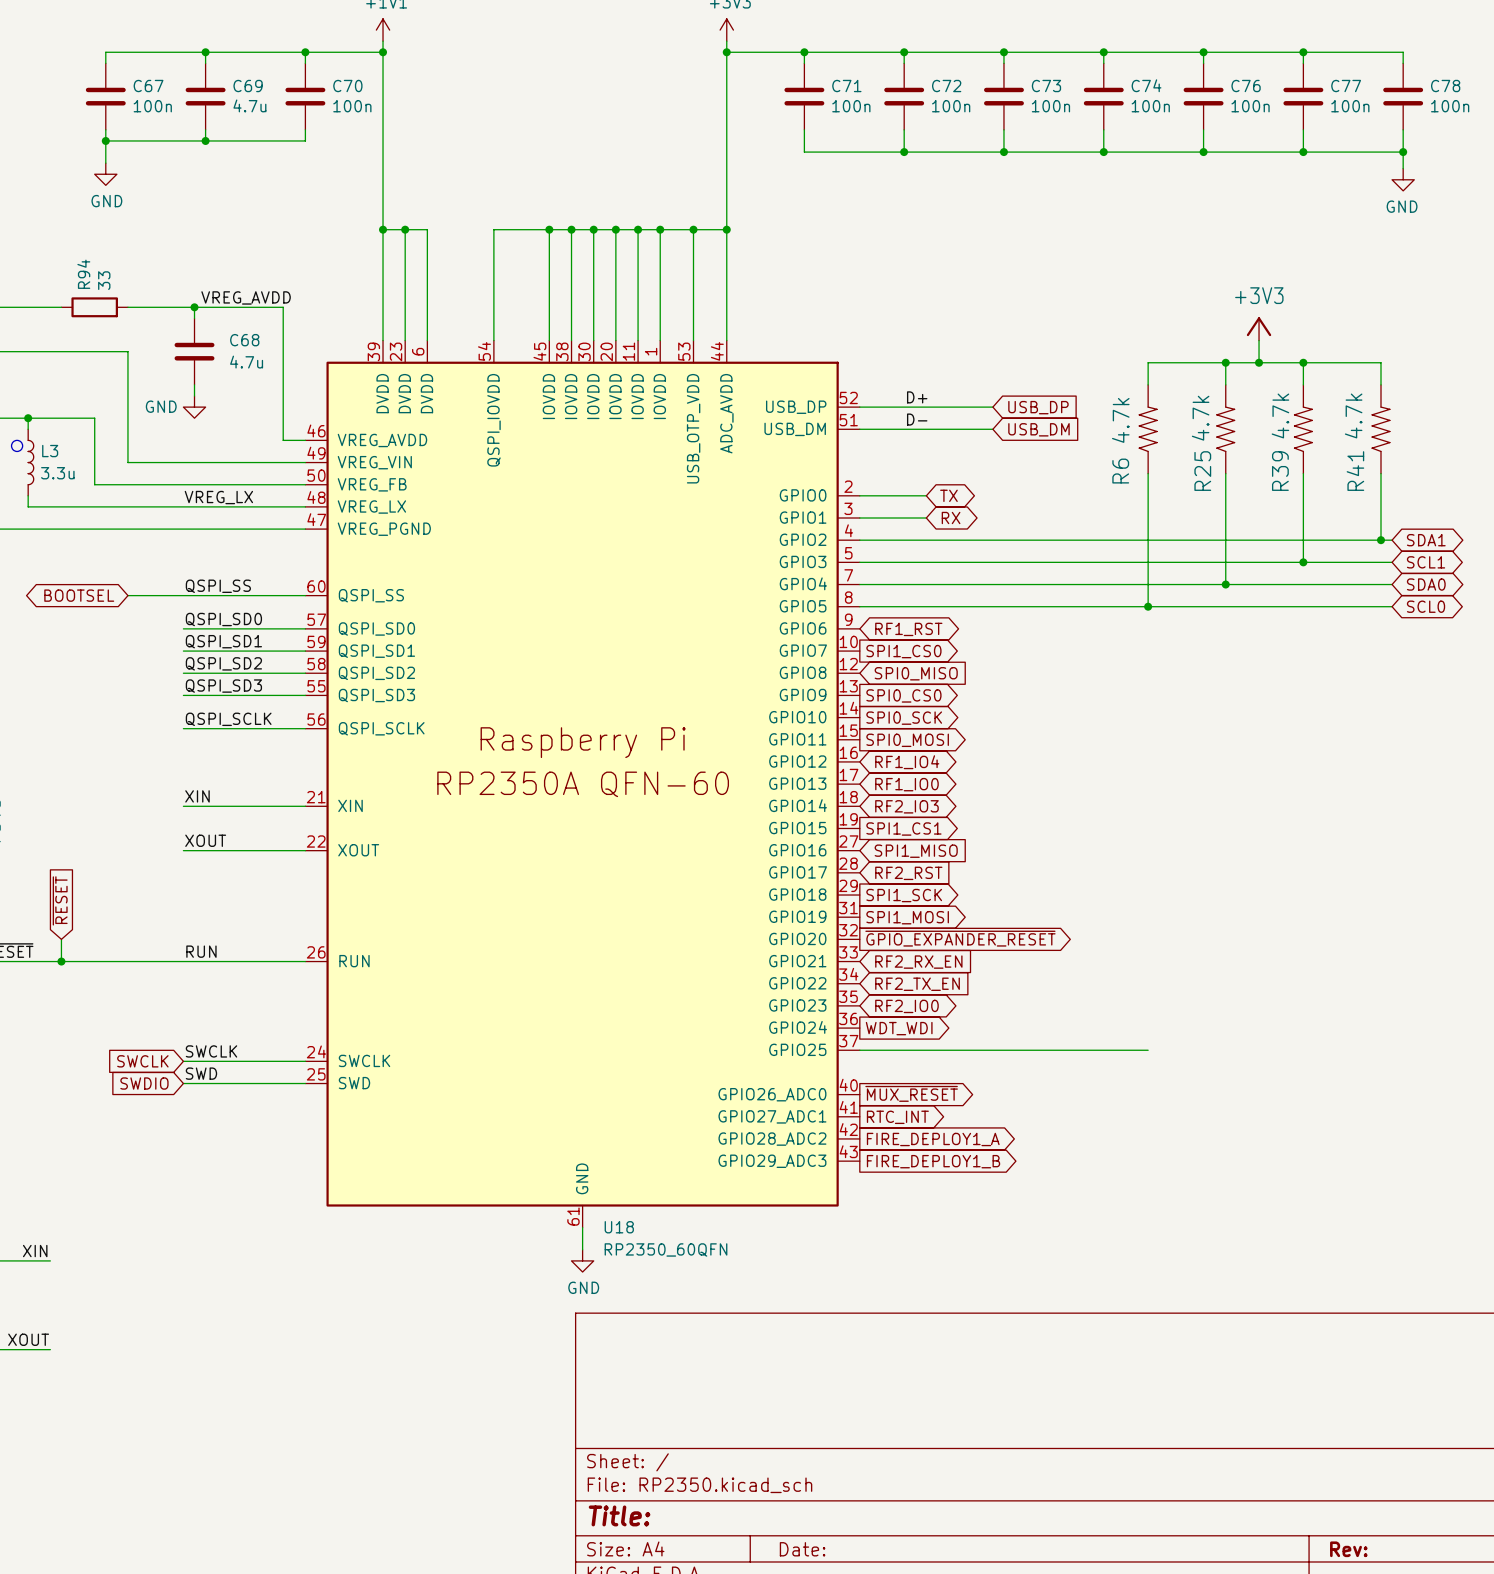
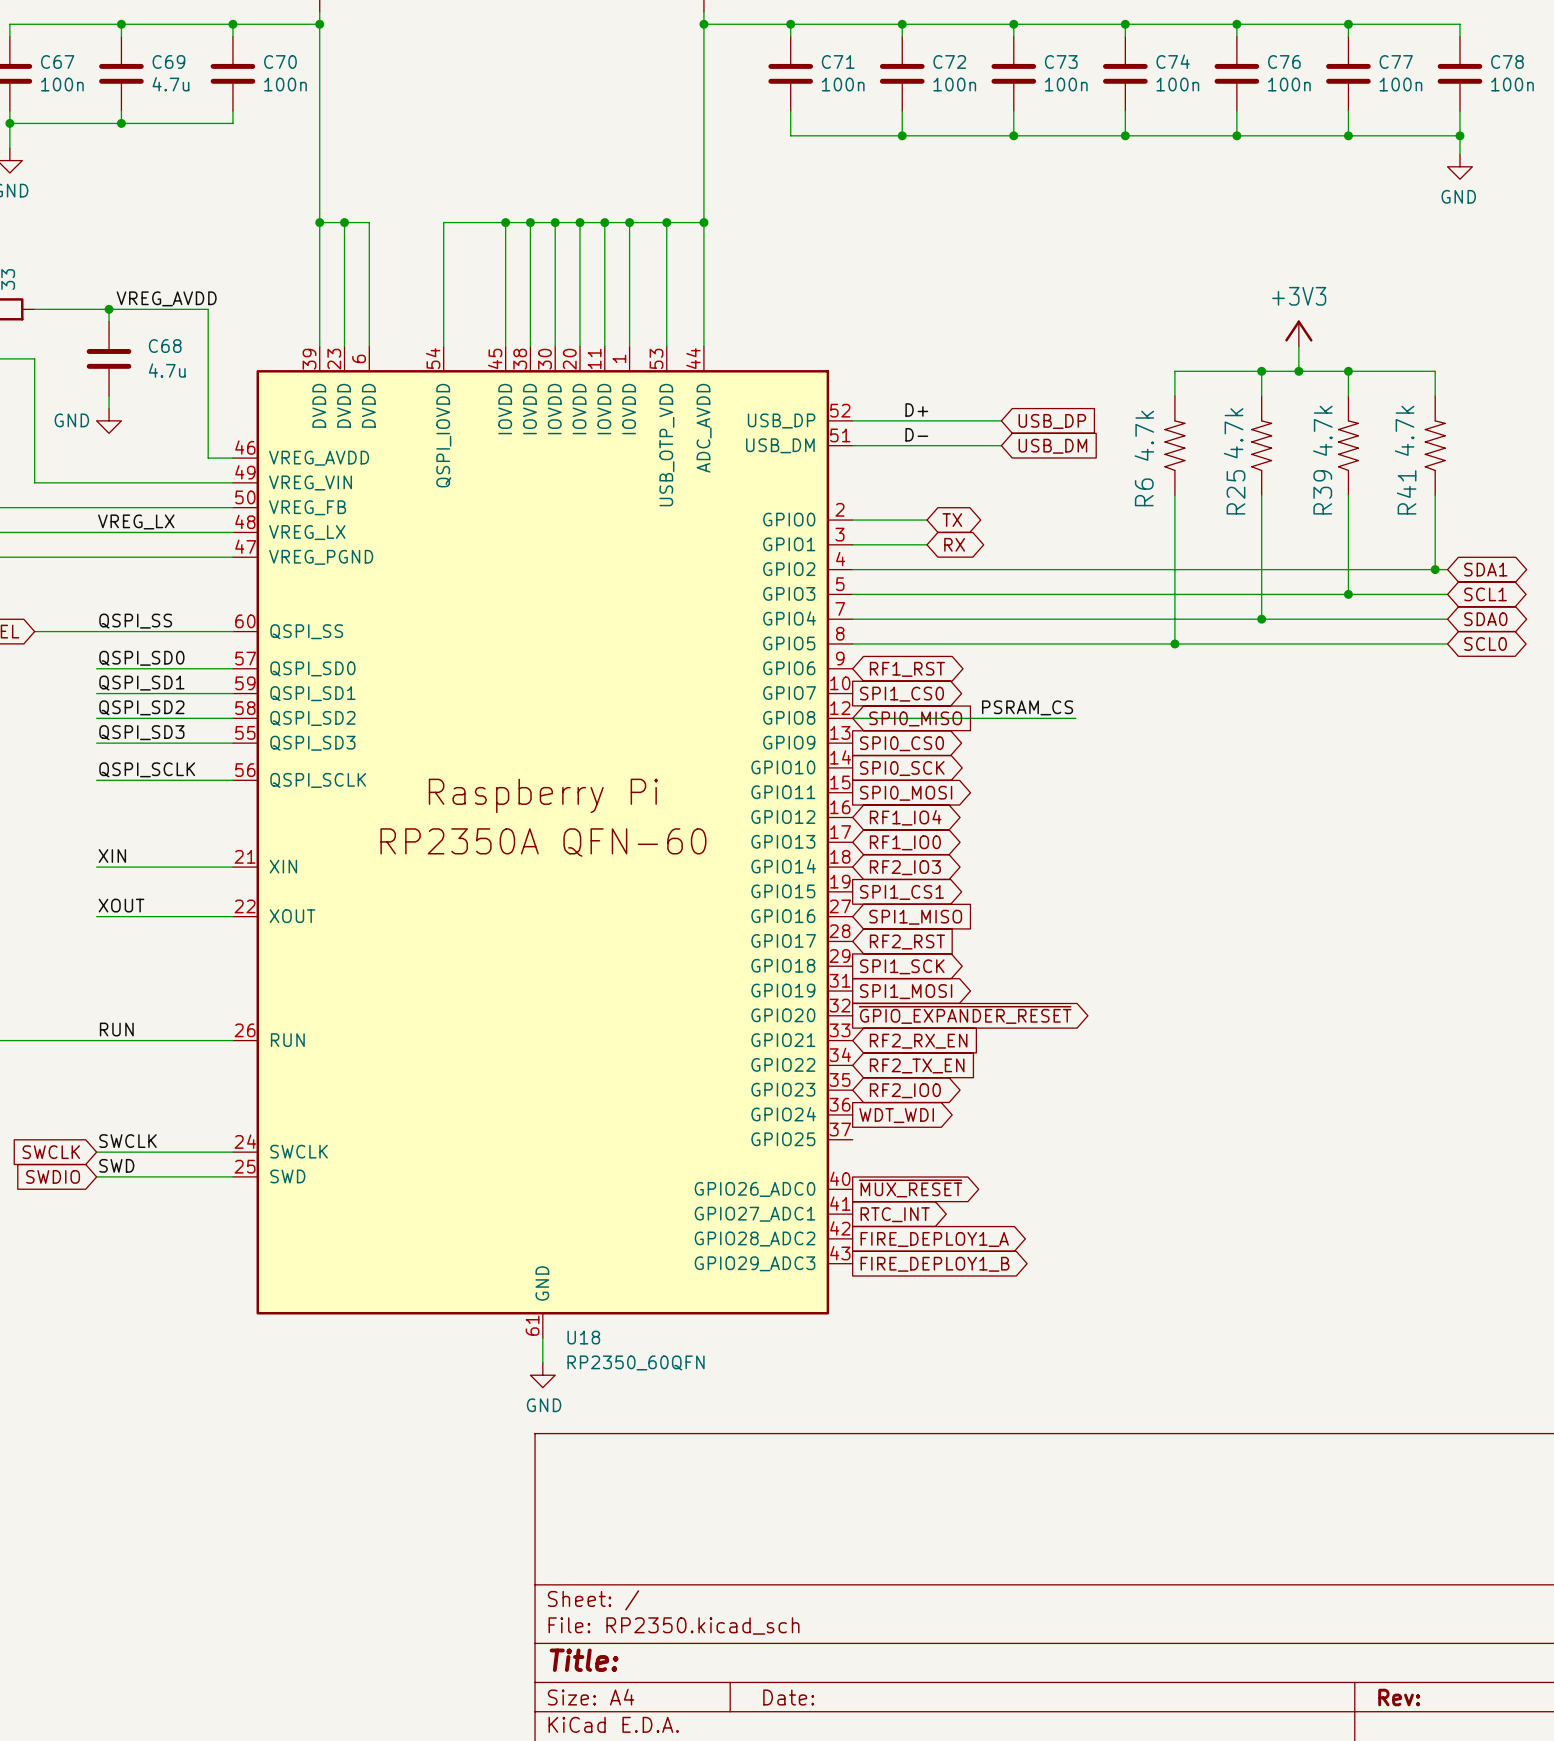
label: none -> PSRAM_CS (1027, 707)
wire: none -> (852, 718) (1075, 718)
wire: (859, 1050) (1148, 1050) -> none

